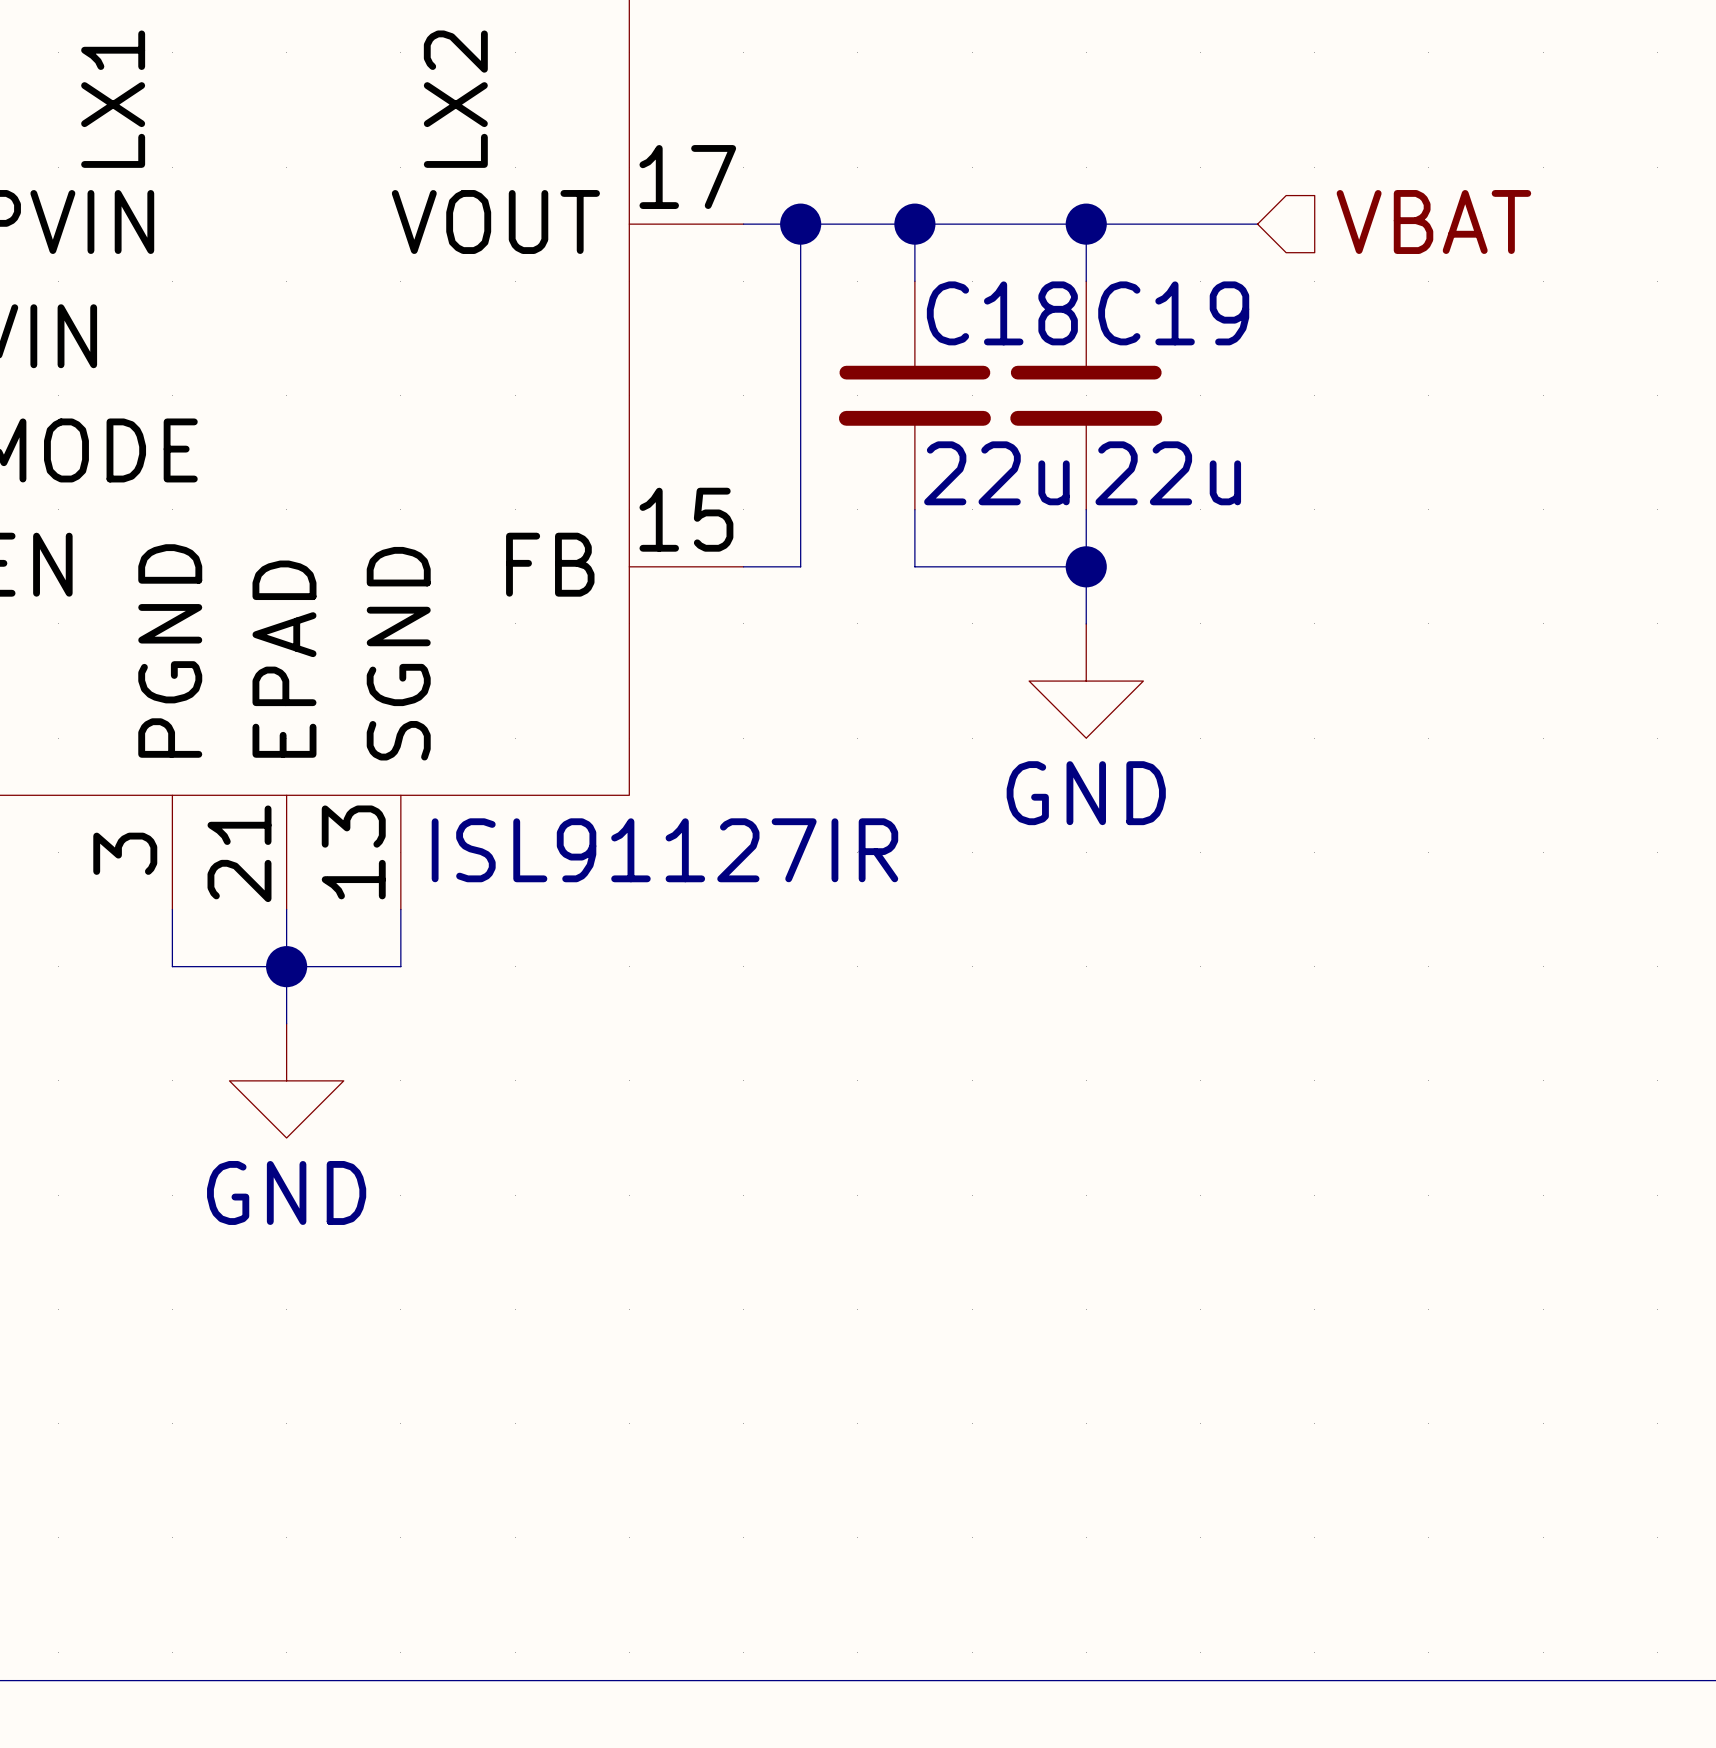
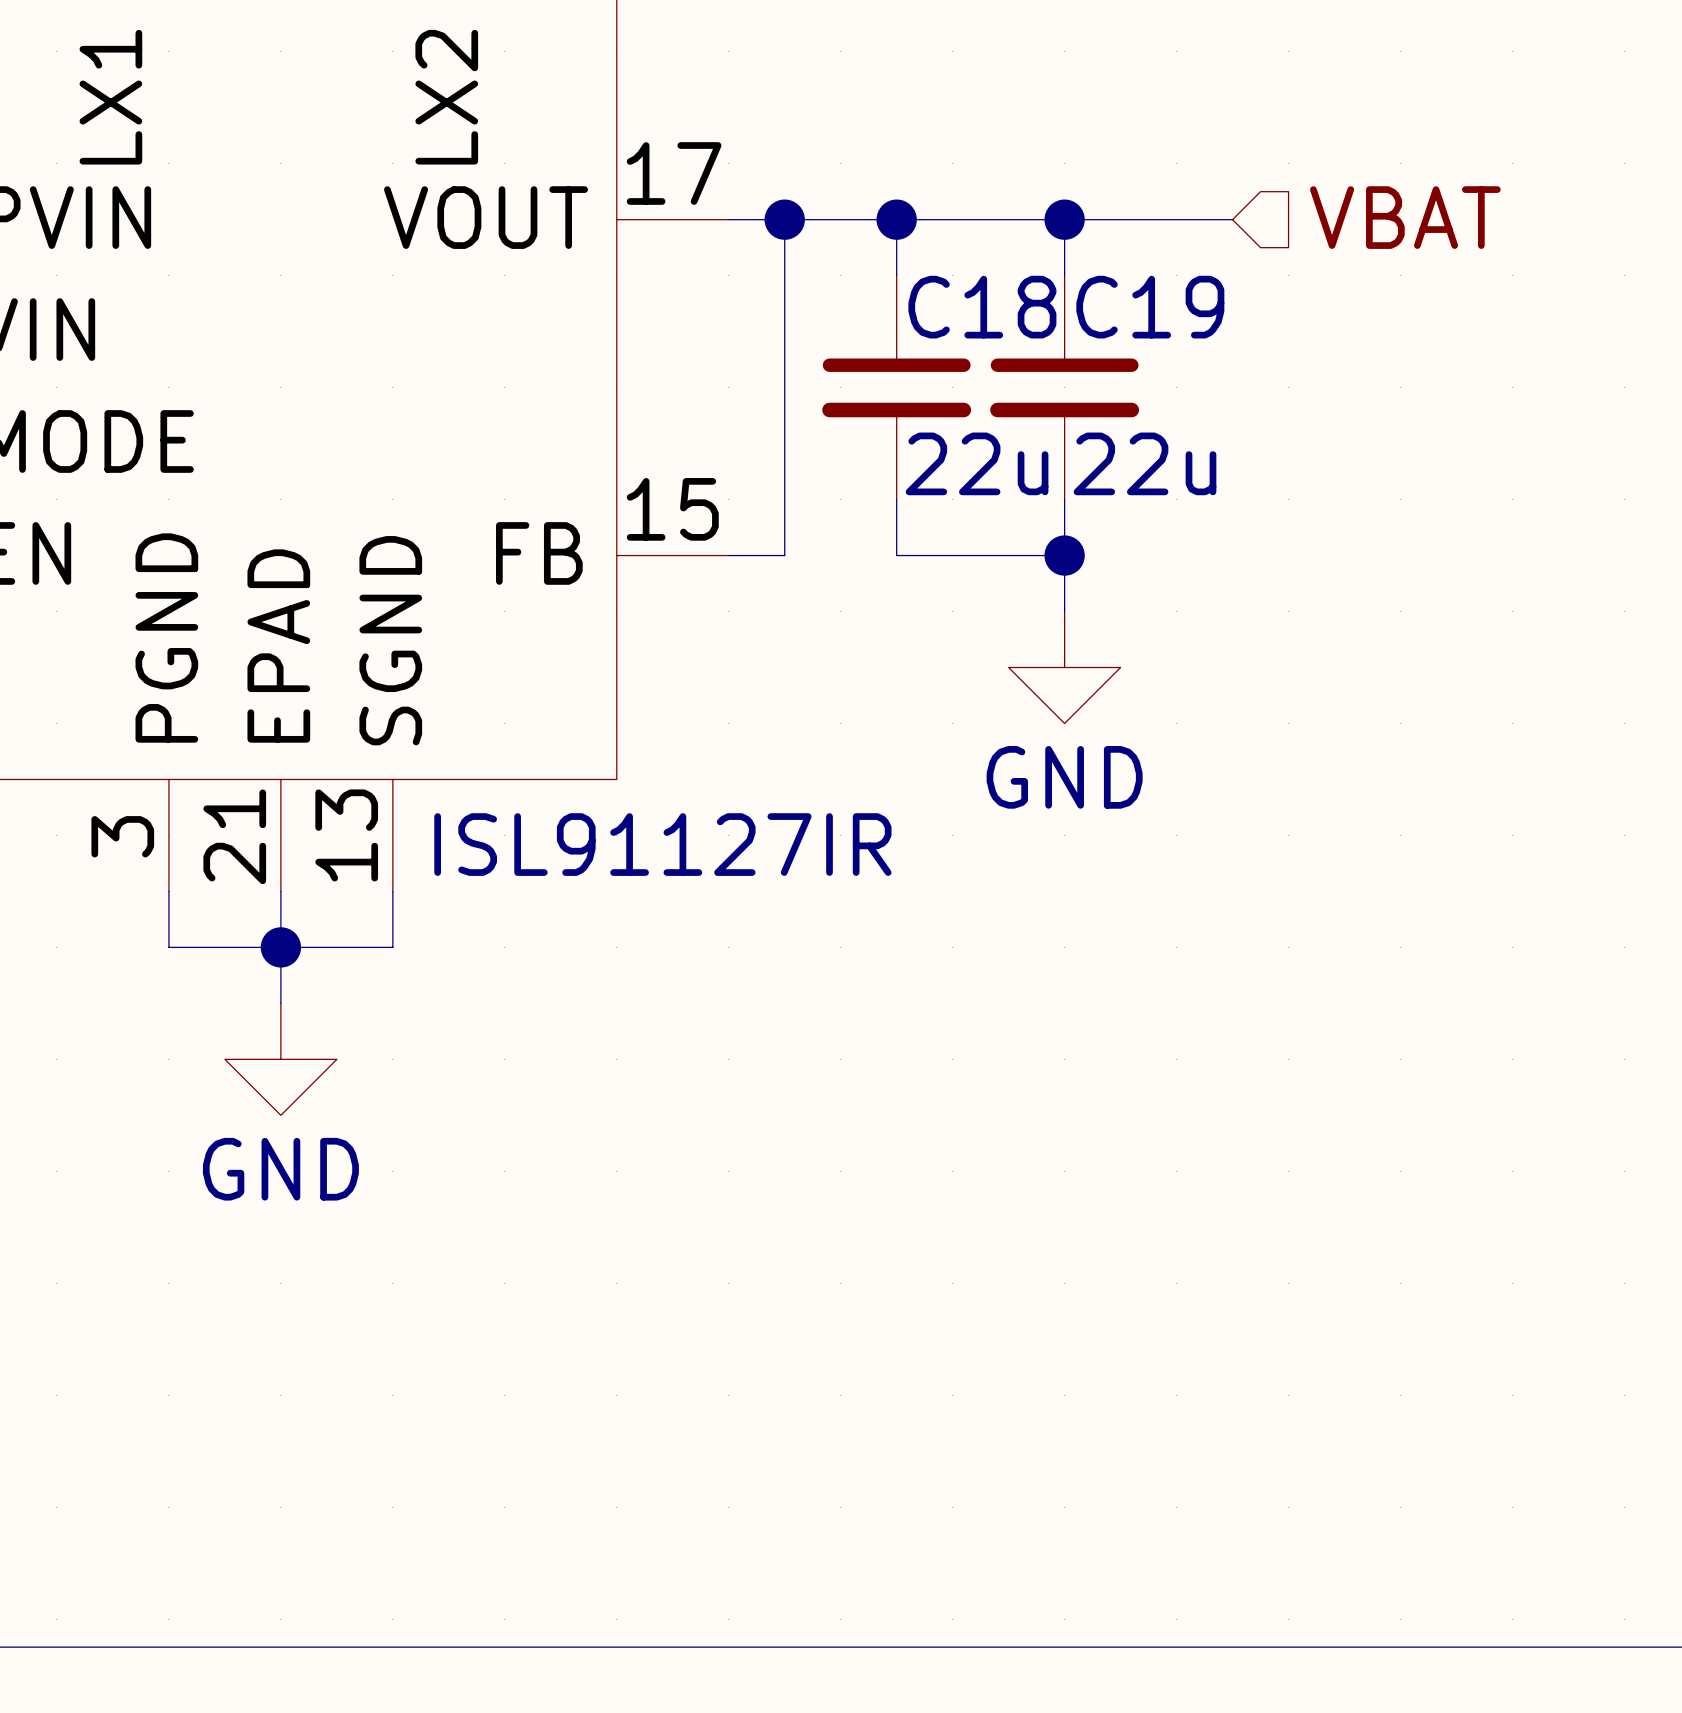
part value position: ISL91127IR (664, 850) -> ISL91127IR (662, 844)

